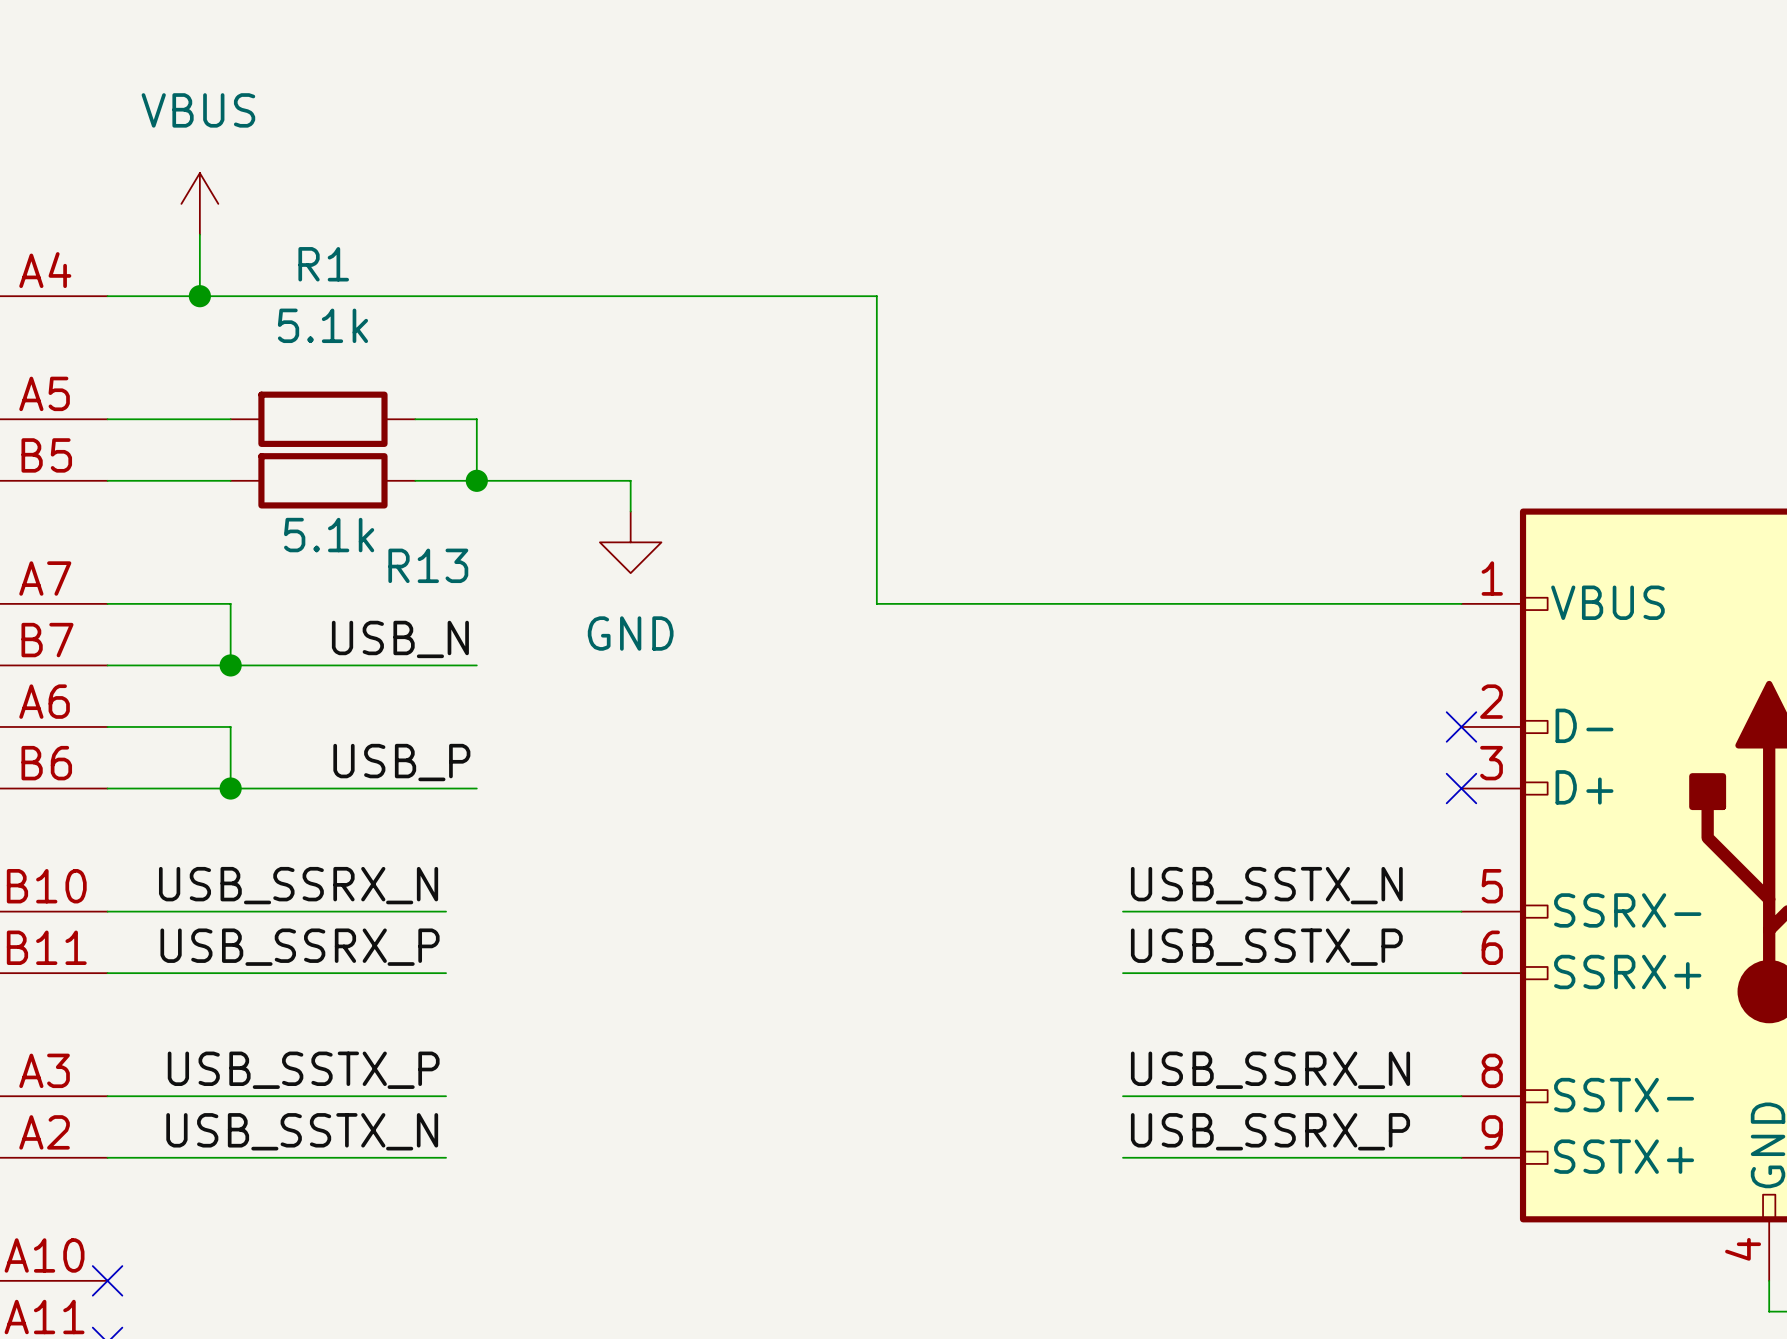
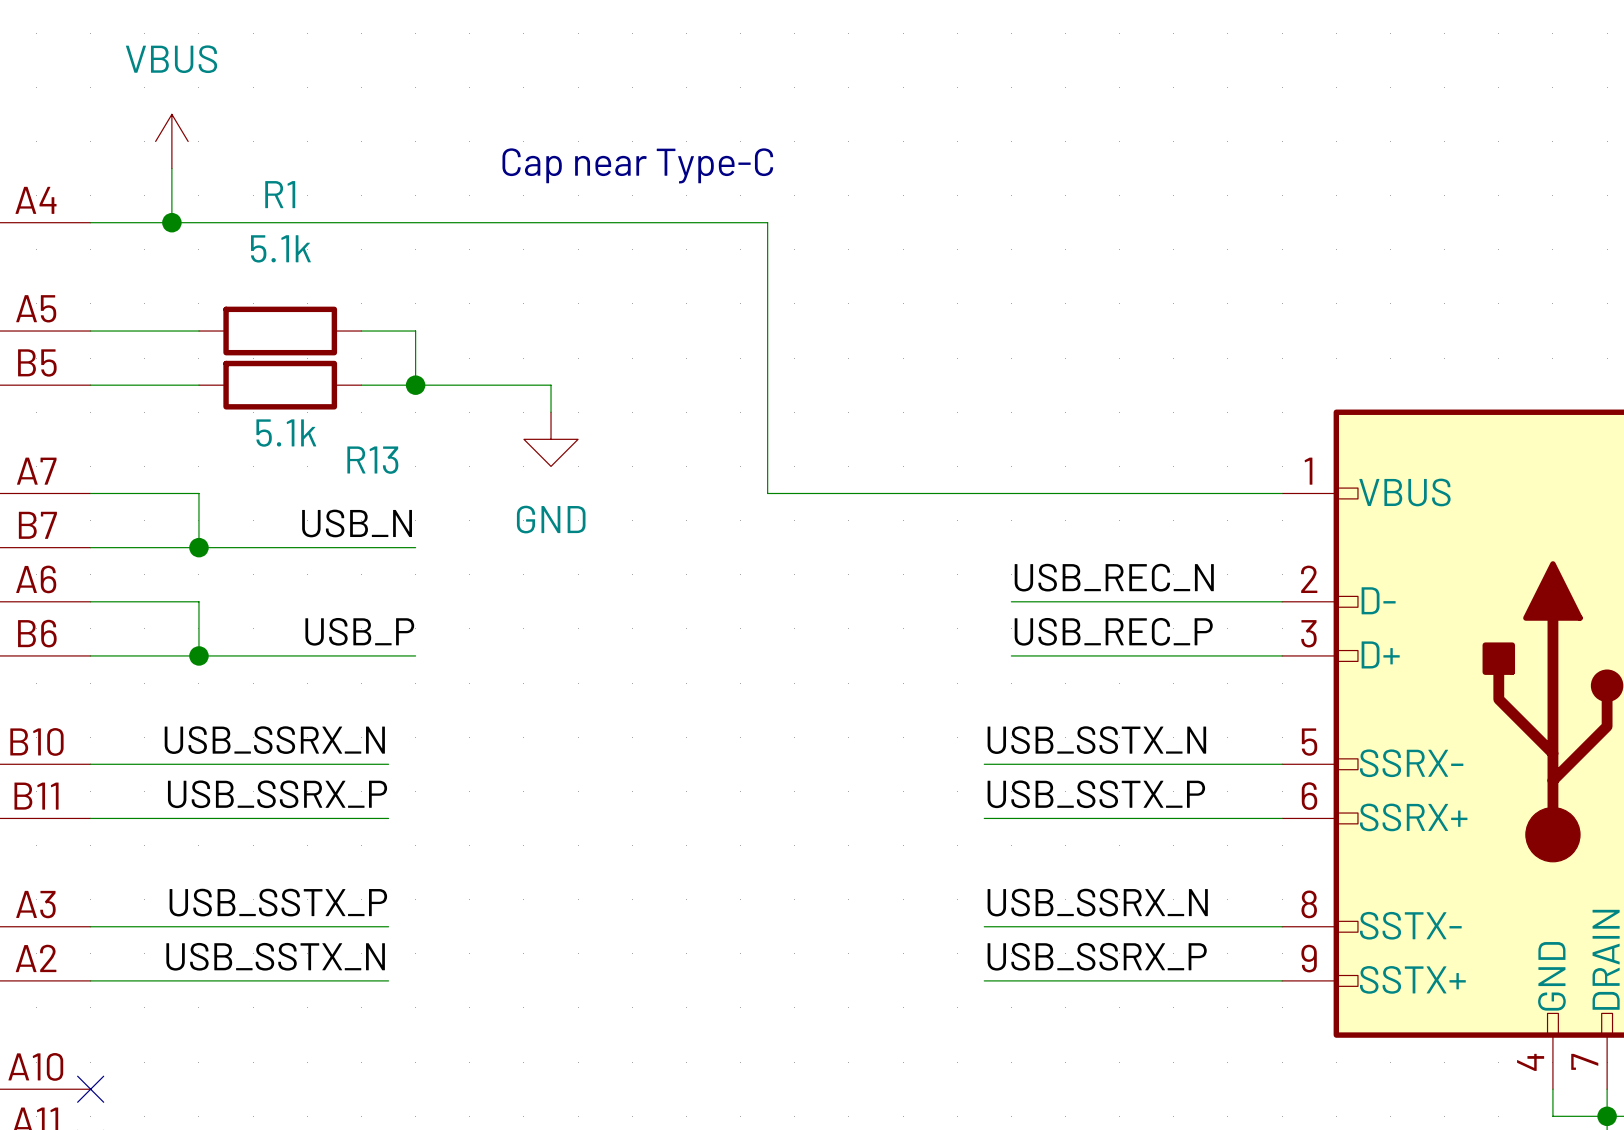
text: none -> Cap near Type-C (637, 165)
label: none -> USB_REC_N (1114, 577)
wire: none -> (1011, 601) (1282, 601)
no-connect mark: (1461, 726) -> none
label: none -> USB_REC_P (1113, 631)
wire: none -> (1011, 655) (1282, 655)
no-connect mark: (1461, 788) -> none

